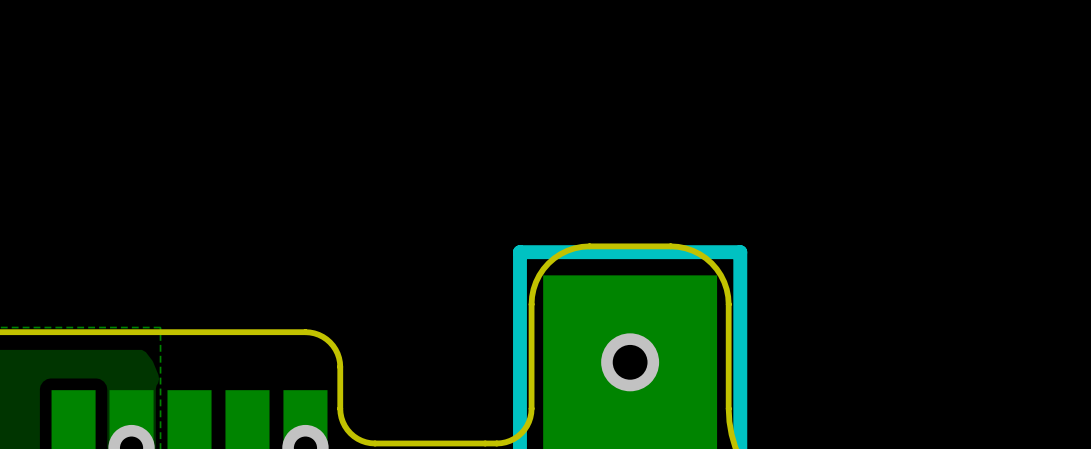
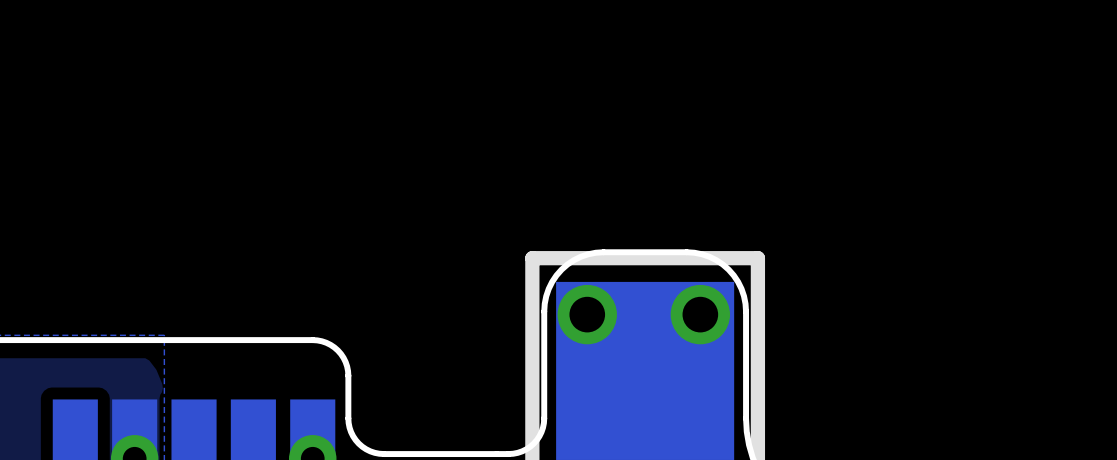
via: none -> (587, 314)
via: none -> (700, 314)
via: (630, 362) -> none

